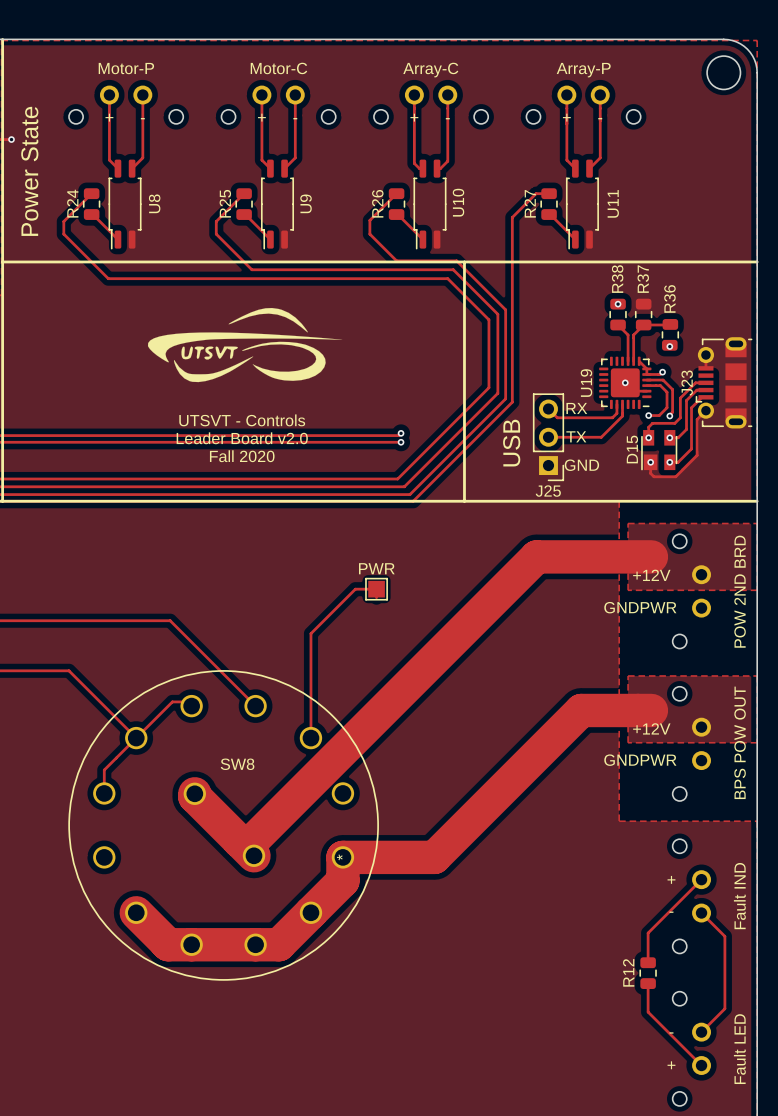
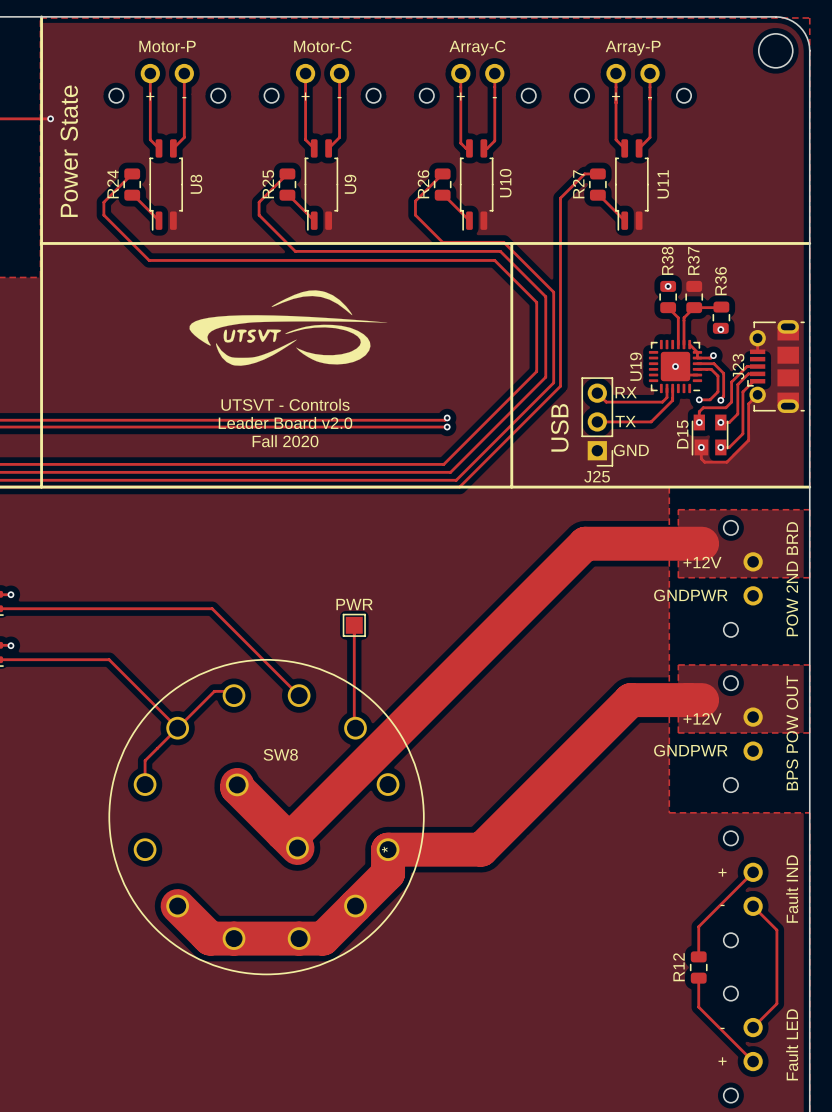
text position: PWR (376, 568) -> PWR (354, 604)
part position: (376, 589) -> (354, 625)
track: (376, 597) (376, 589) (355, 589) (310, 633) (310, 738) -> (354, 625) (355, 728)

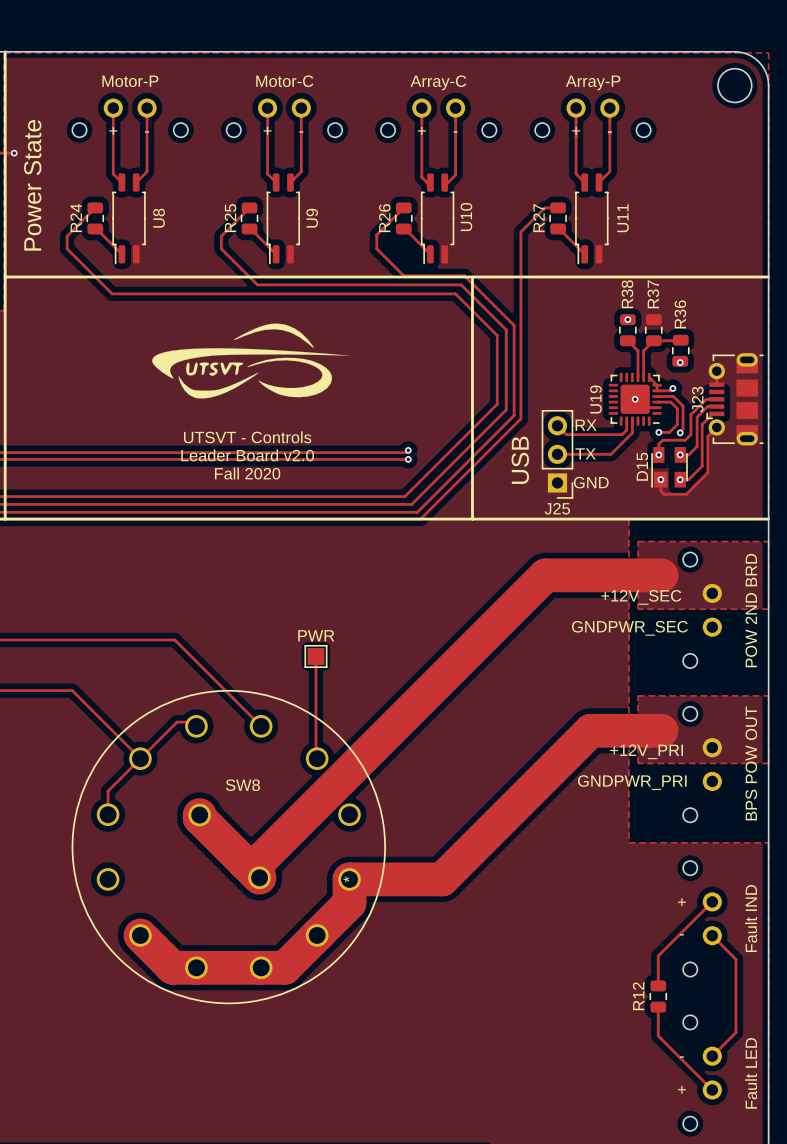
text: +12V (702, 562) -> +12V_SEC (641, 597)
text: GNDPWR (690, 595) -> GNDPWR_SEC (629, 628)
text: +12V (702, 718) -> +12V_PRI (646, 751)
text: GNDPWR (690, 750) -> GNDPWR_PRI (632, 782)

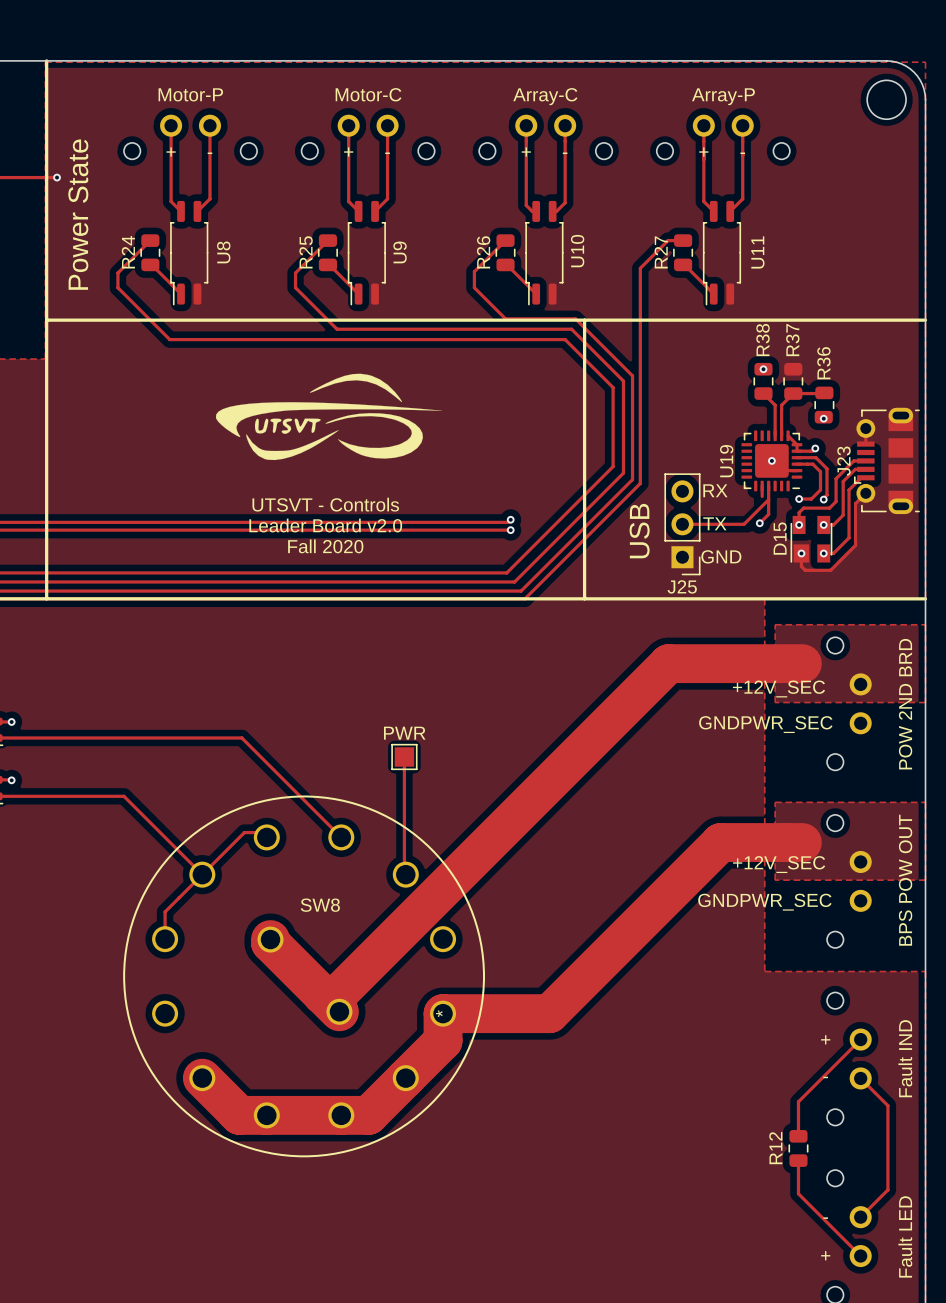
track: (557, 425) (566, 434) (622, 434) (626, 430) -> none
track: none -> (768, 499) (768, 514) (759, 523)
via: none -> (759, 523)
text: +12V_PRI (646, 751) -> +12V_SEC (779, 864)
text: GNDPWR_PRI (632, 782) -> GNDPWR_SEC (764, 902)

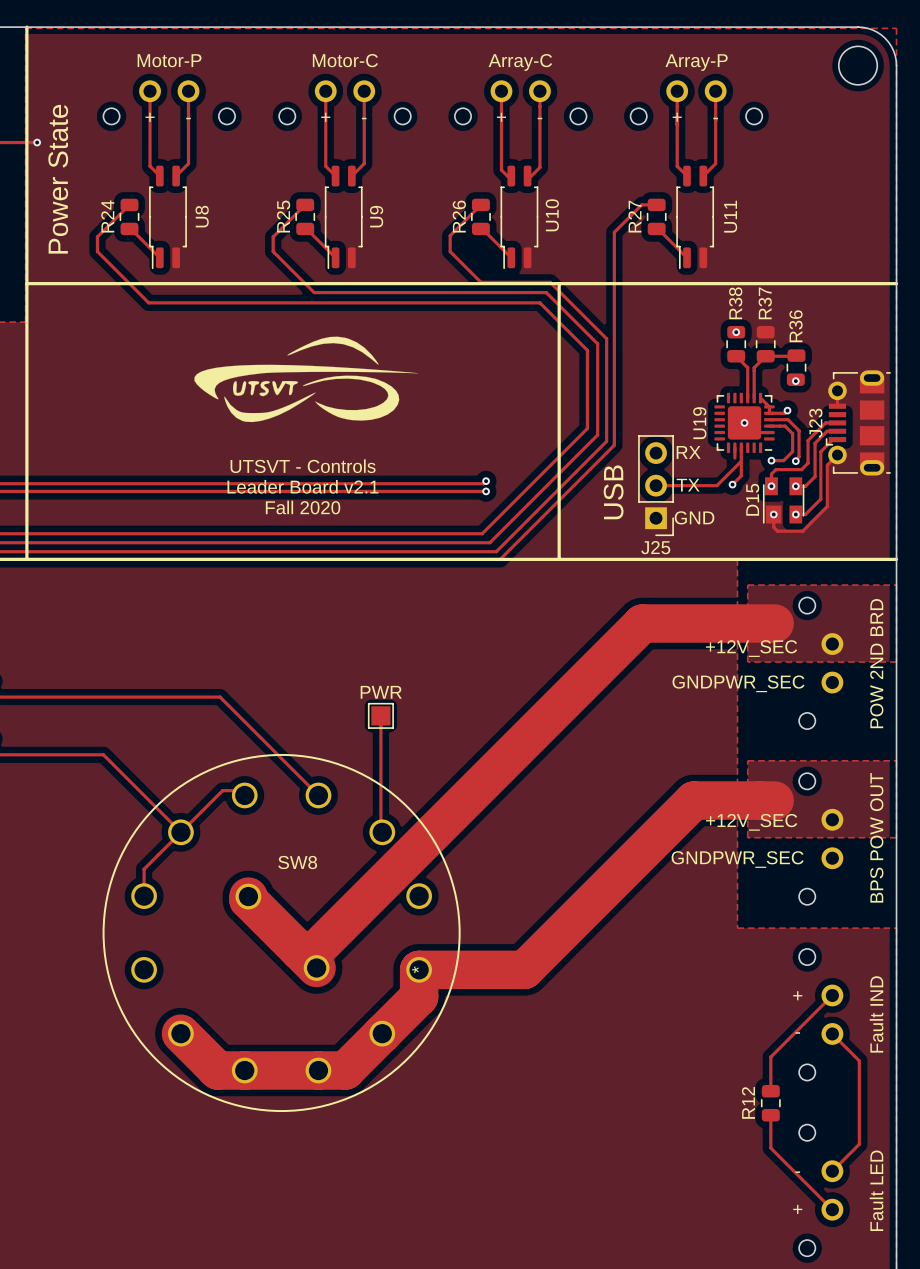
text: Leader Board v2.0 (325, 525) -> Leader Board v2.1 (302, 486)

